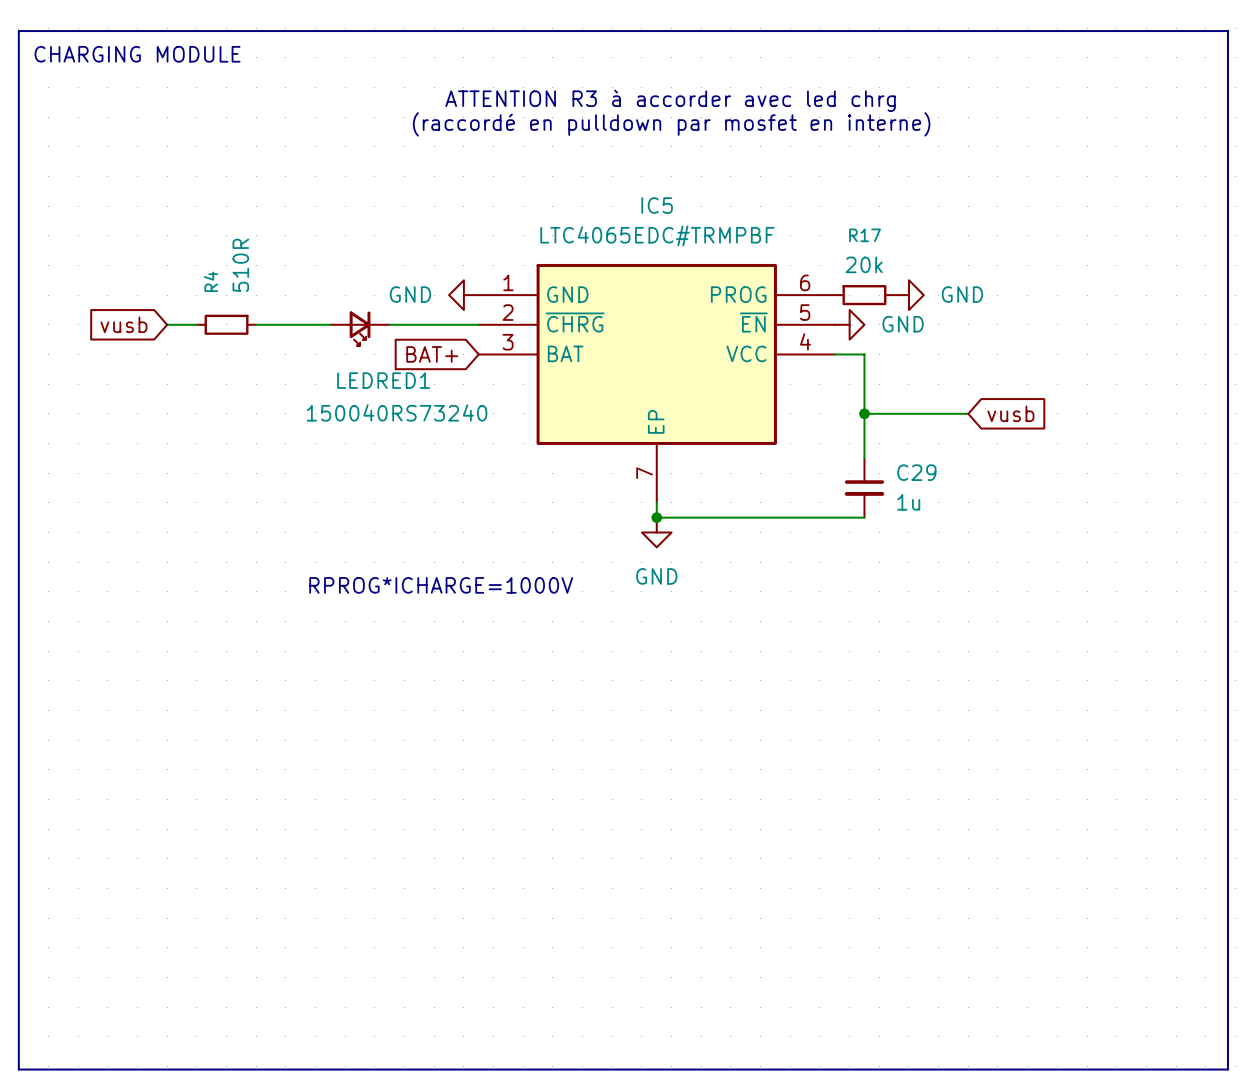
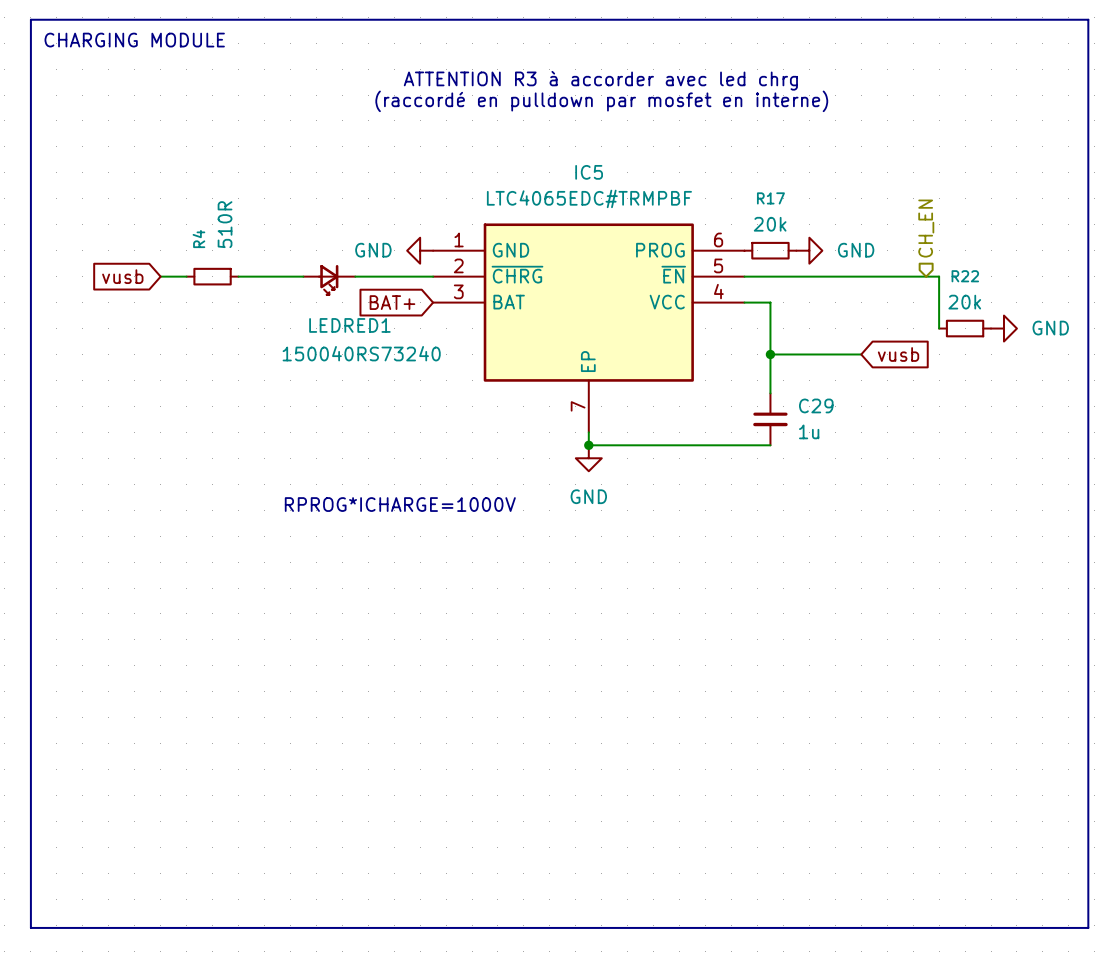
hierarchical label: none -> CH_EN (926, 228)
wire: none -> (744, 276) (939, 276) (939, 328)
power symbol position: GND (849, 324) -> GND (1003, 328)
R22: none -> 20k (965, 328)

